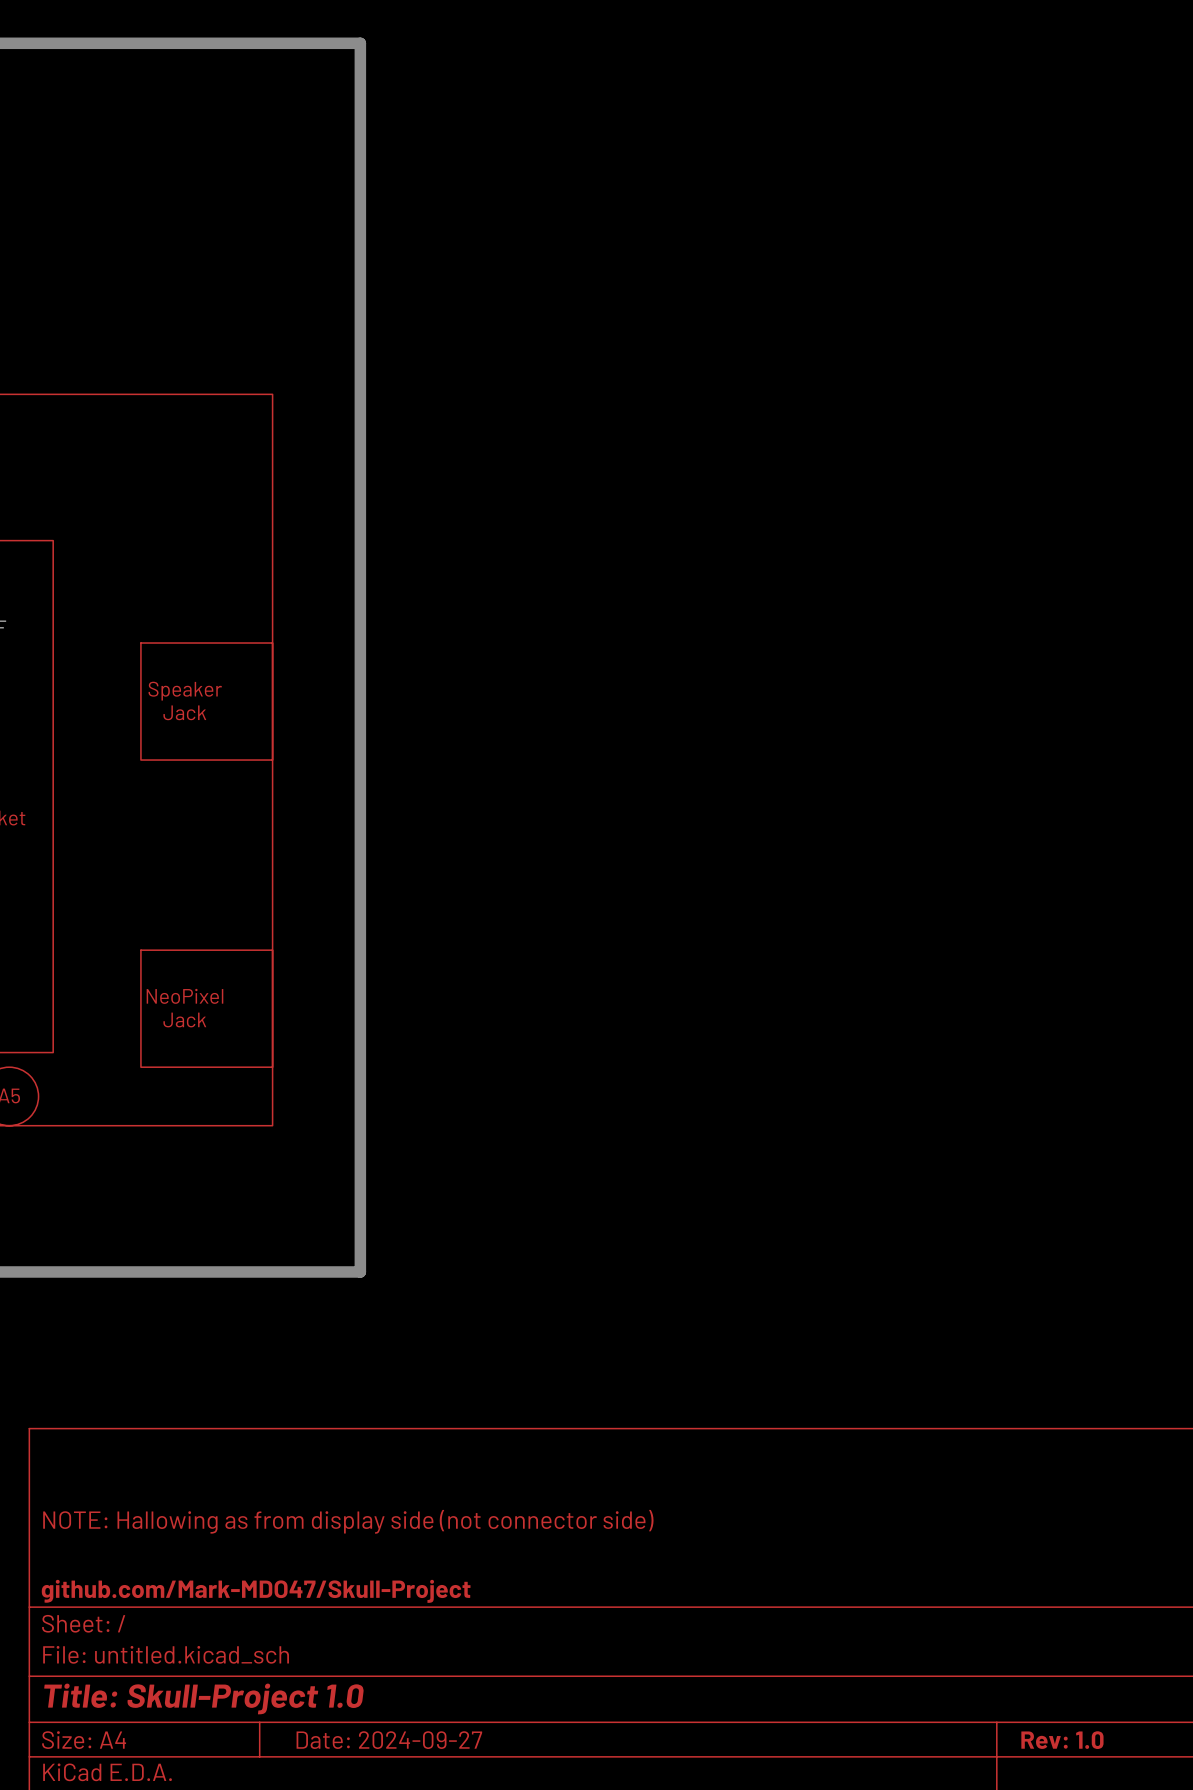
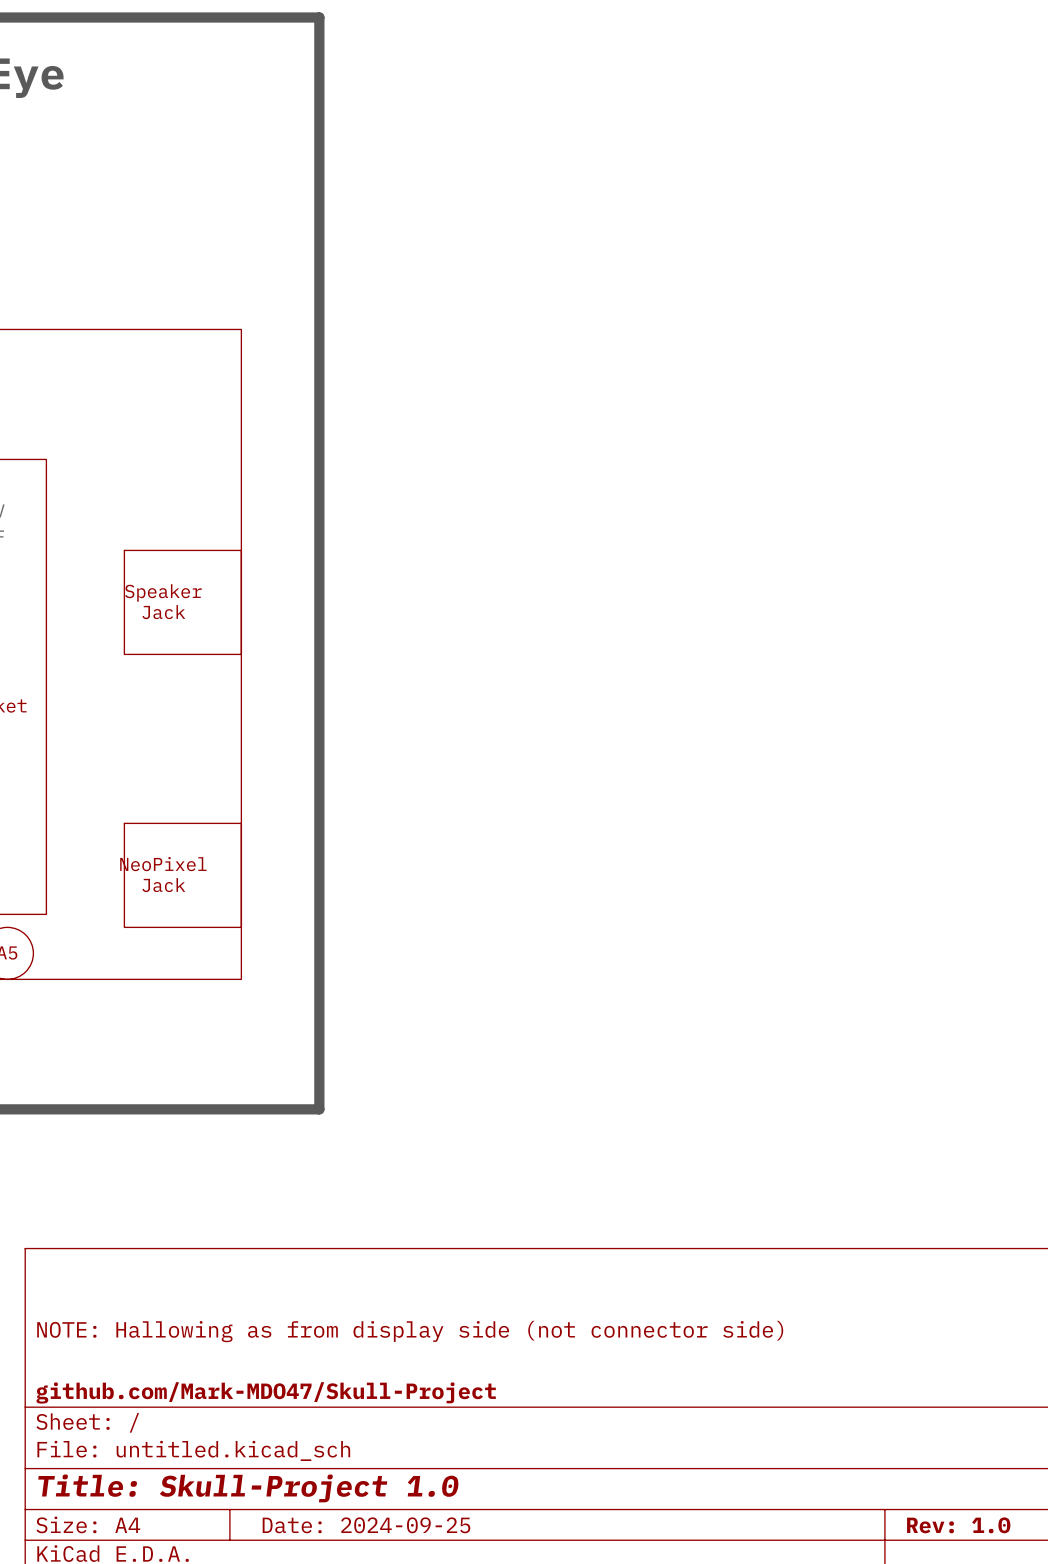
title block: Date: 2024-09-27 (389, 1740) -> Date: 2024-09-25 (366, 1525)

